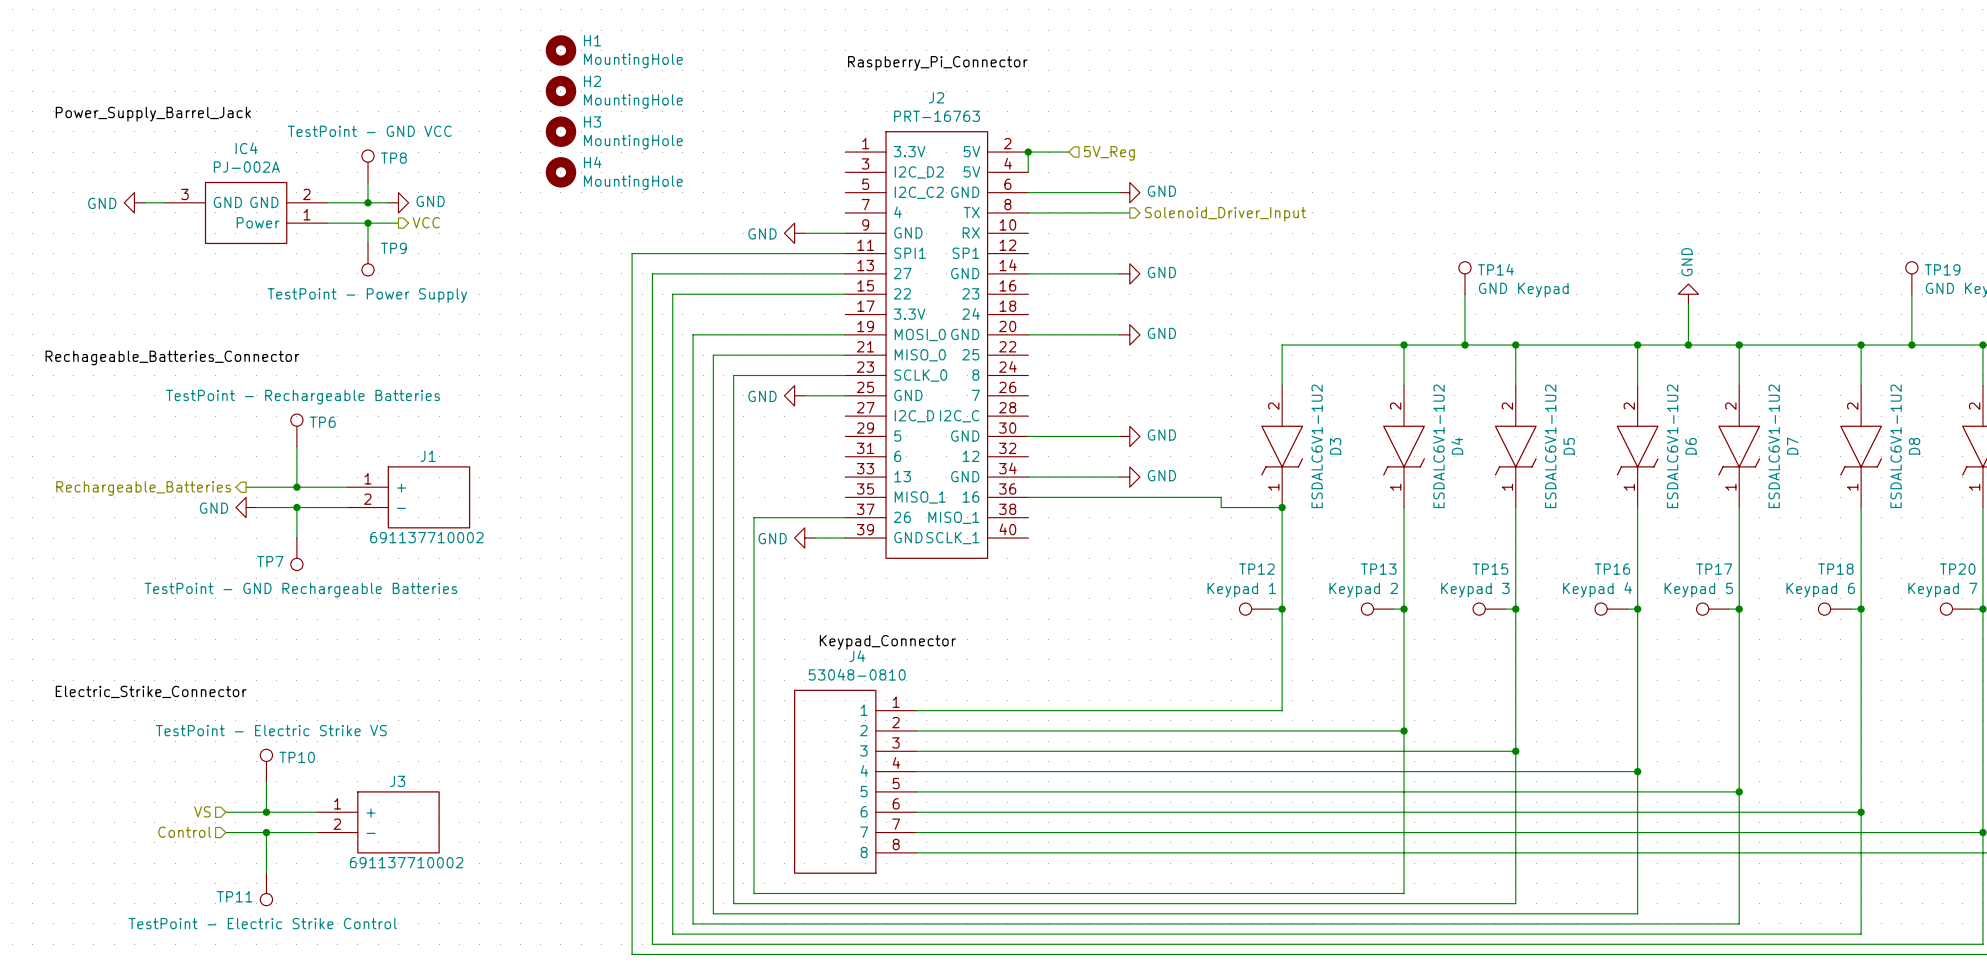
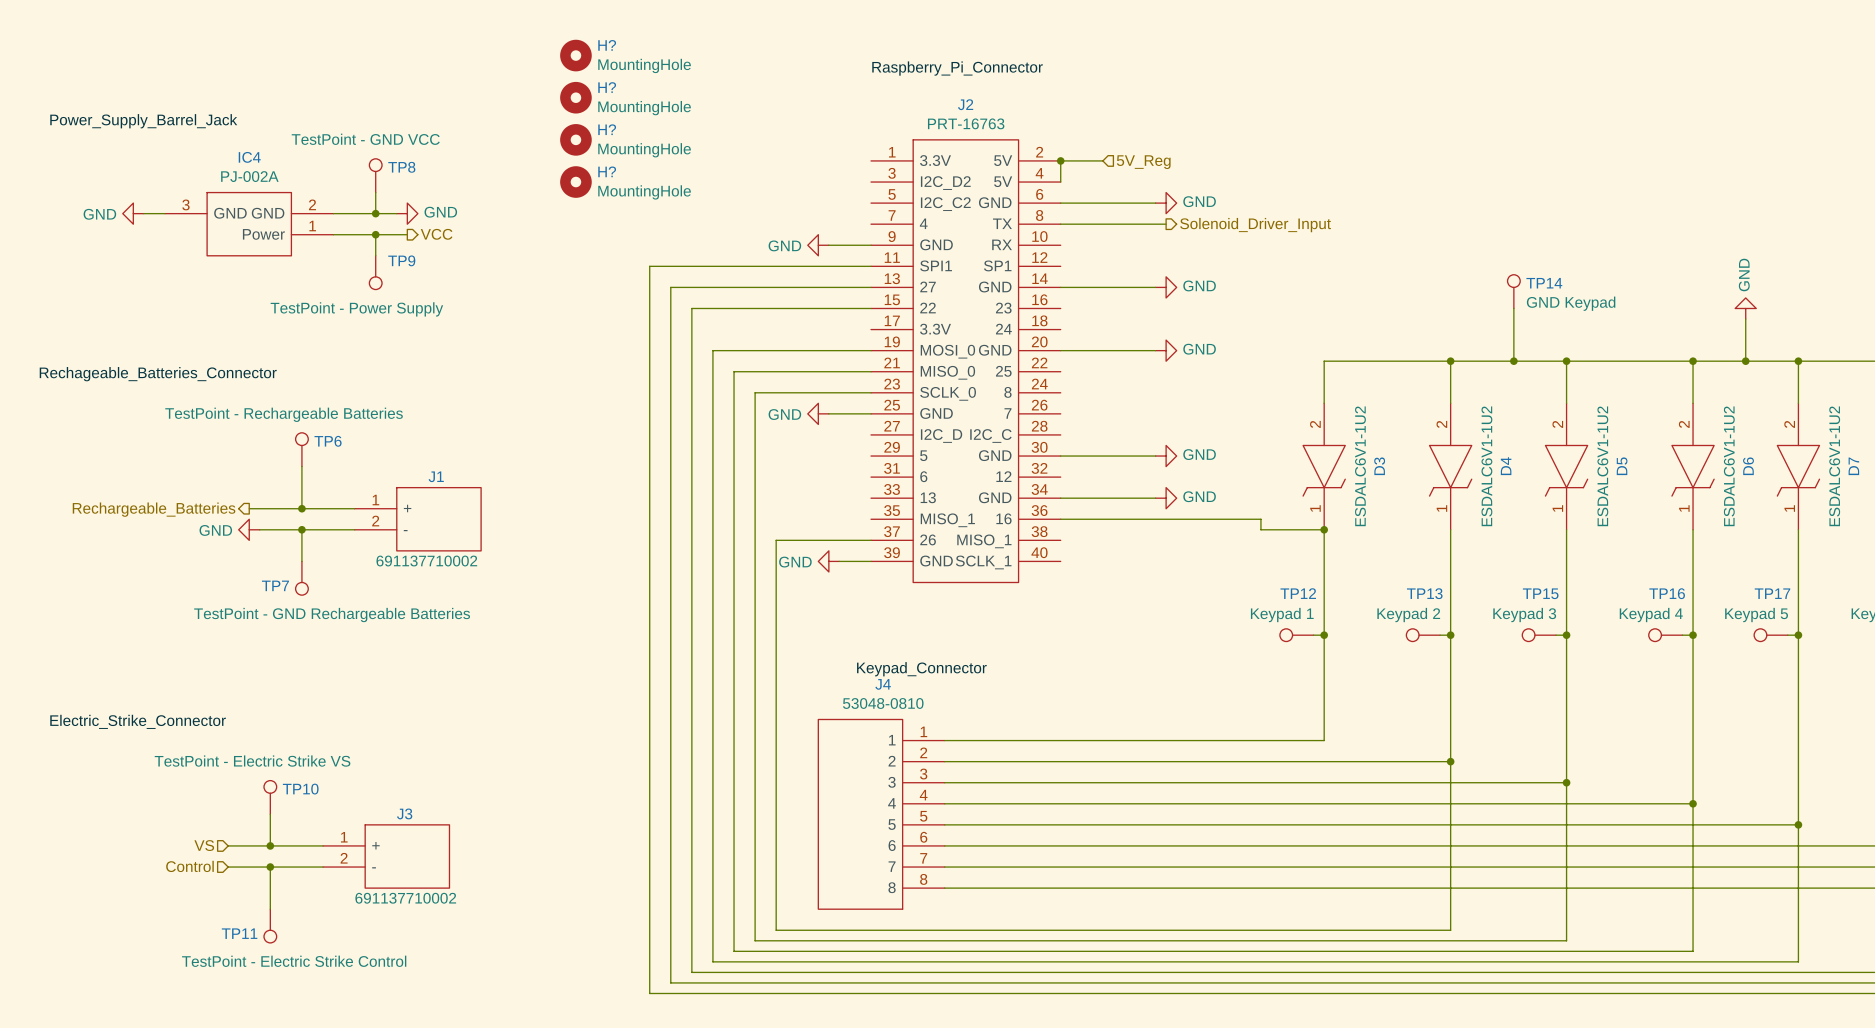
H1 name: H1 (592, 40) -> H? (607, 45)
H2 name: H2 (592, 81) -> H? (607, 87)
H3 name: H3 (592, 121) -> H? (607, 129)
H4 name: H4 (592, 162) -> H? (607, 171)

